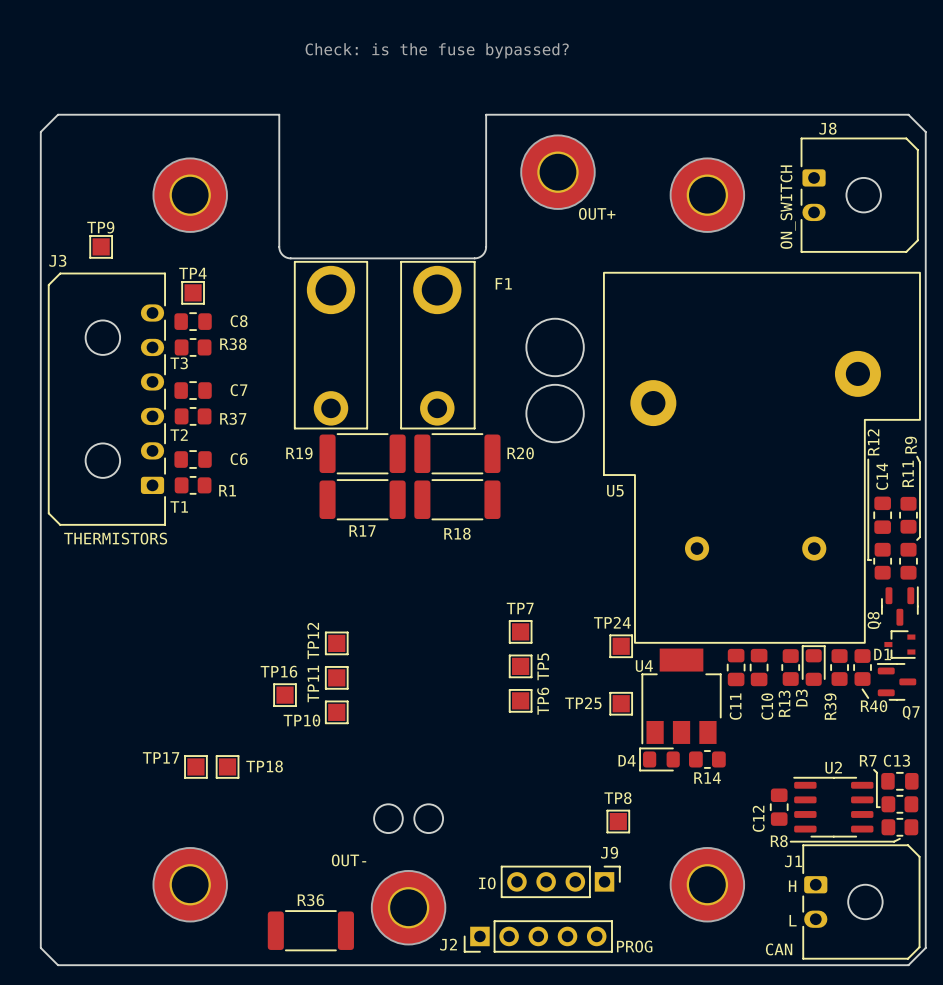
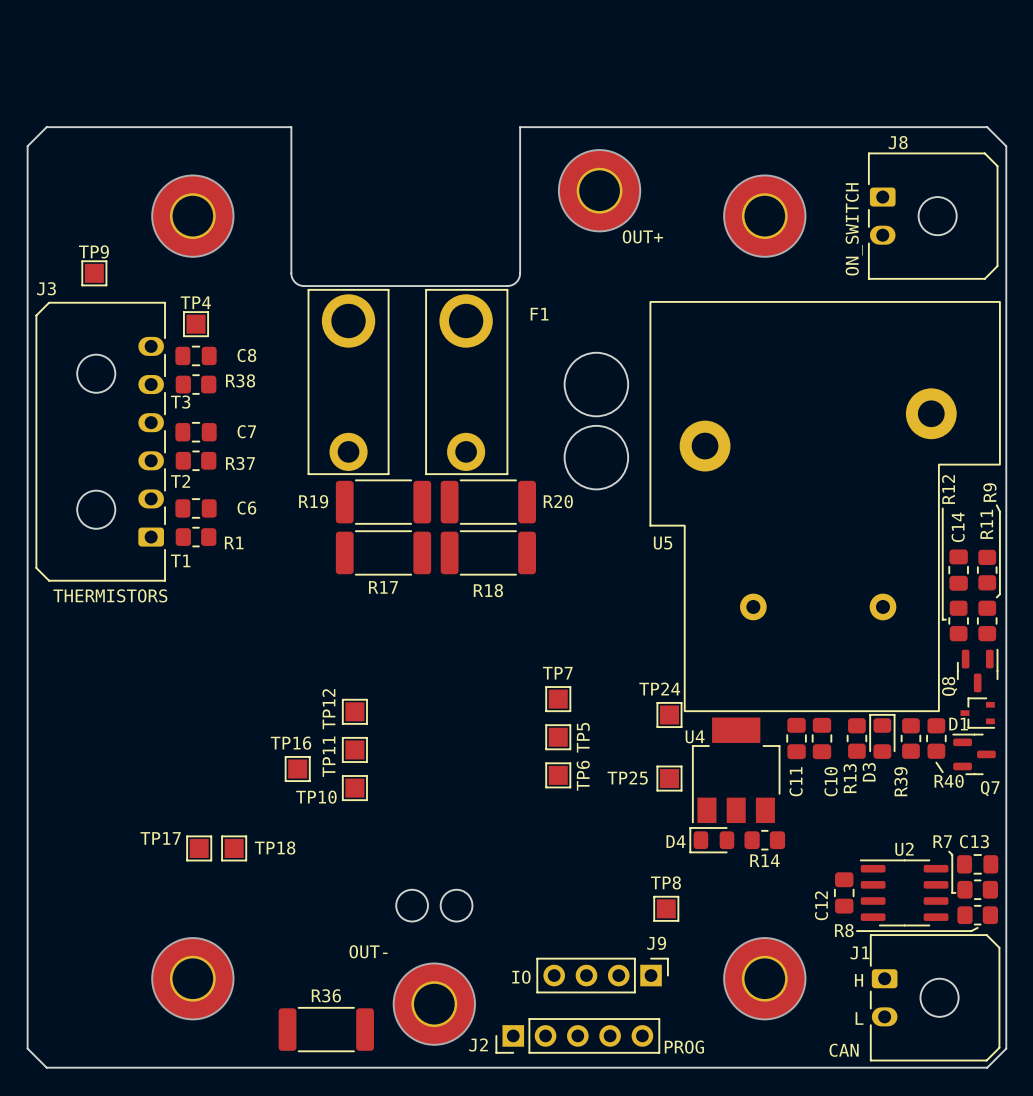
text: Check: is the fuse bypassed? (437, 50) -> none

